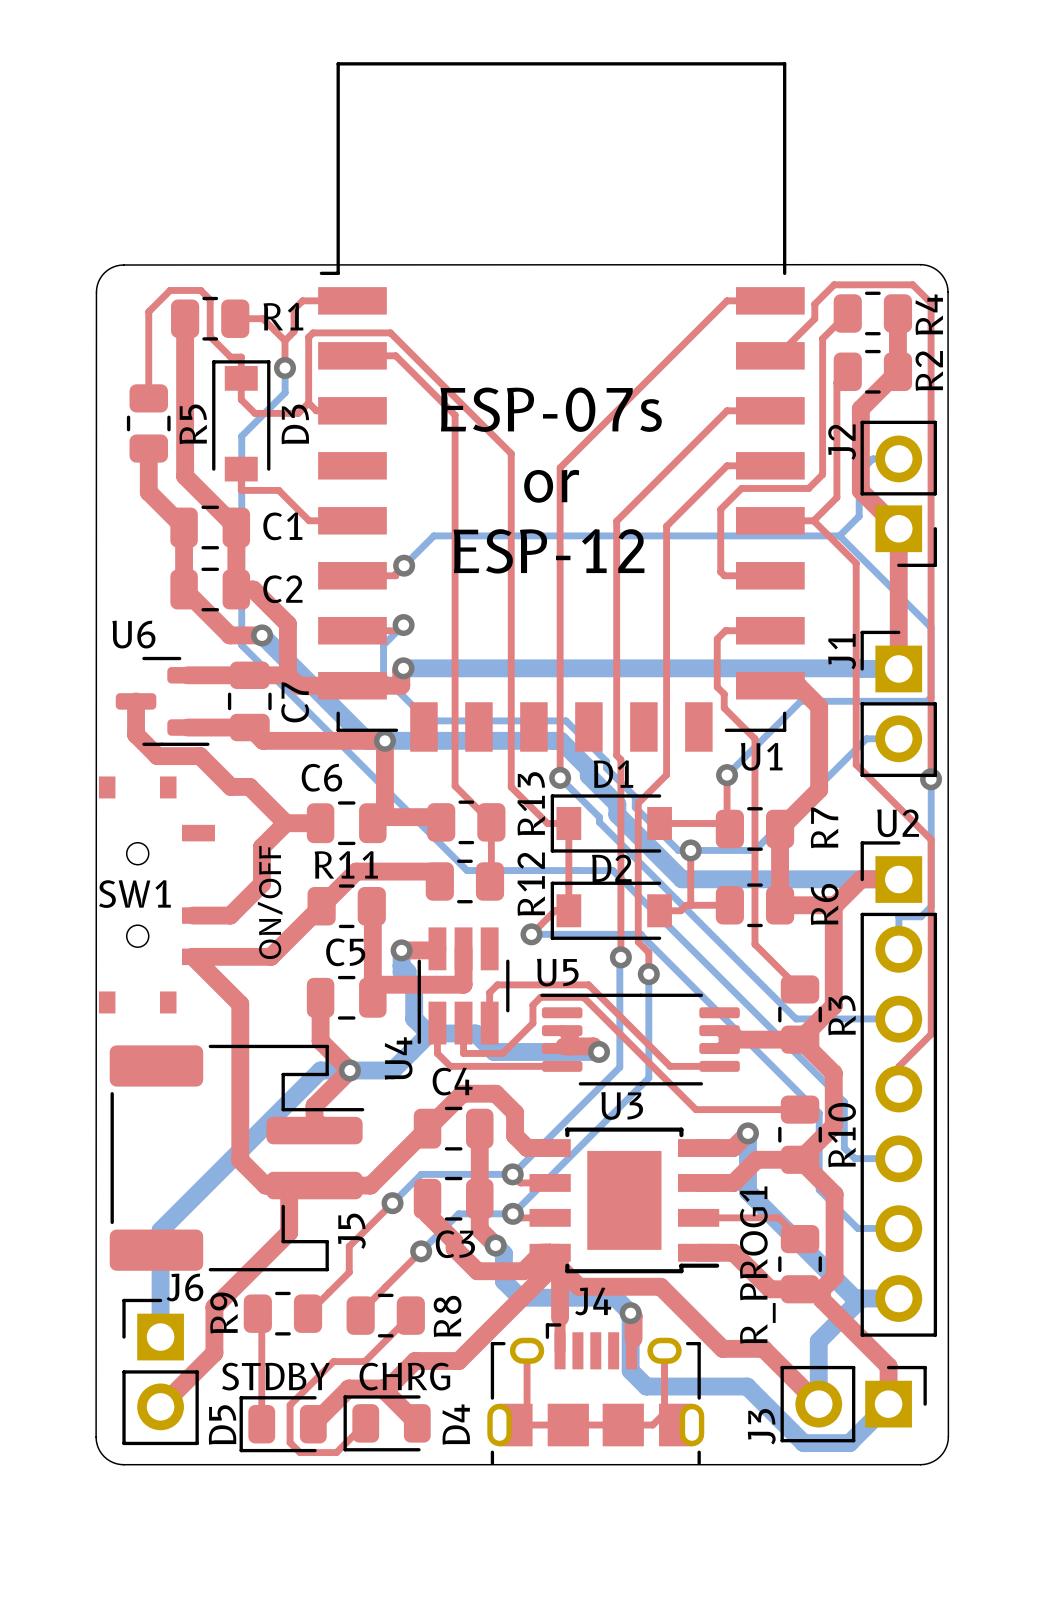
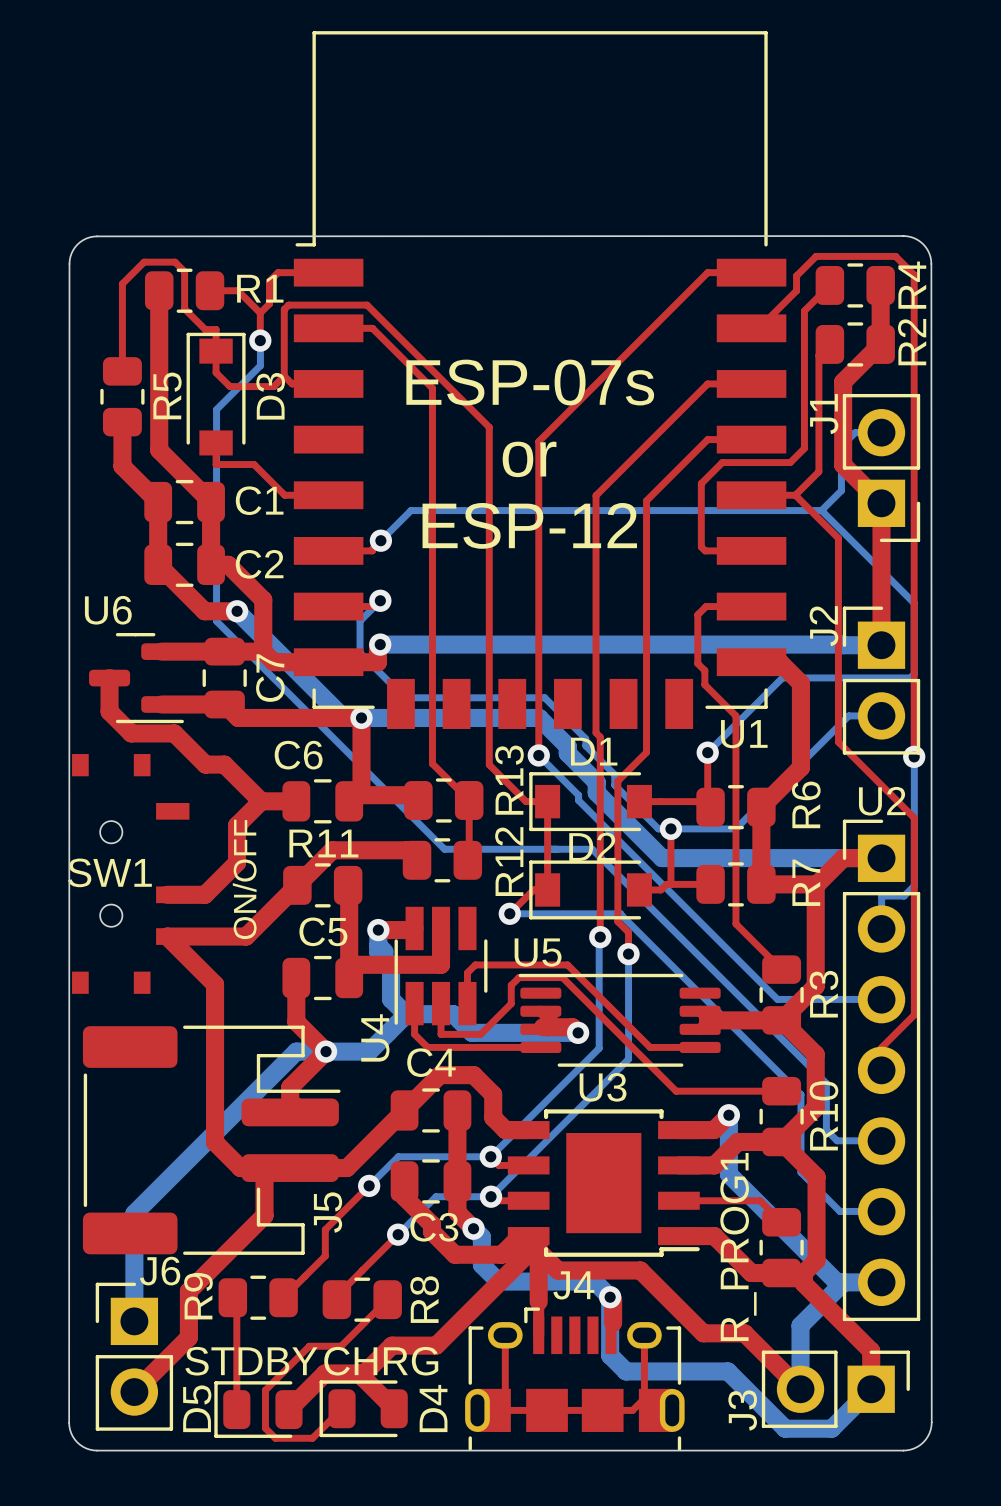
J2 name: J2 (842, 442) -> J1 (824, 414)
J1 name: J1 (842, 651) -> J2 (823, 626)
R7 name: R7 (824, 827) -> R6 (806, 804)
R6 name: R6 (824, 904) -> R7 (806, 882)

